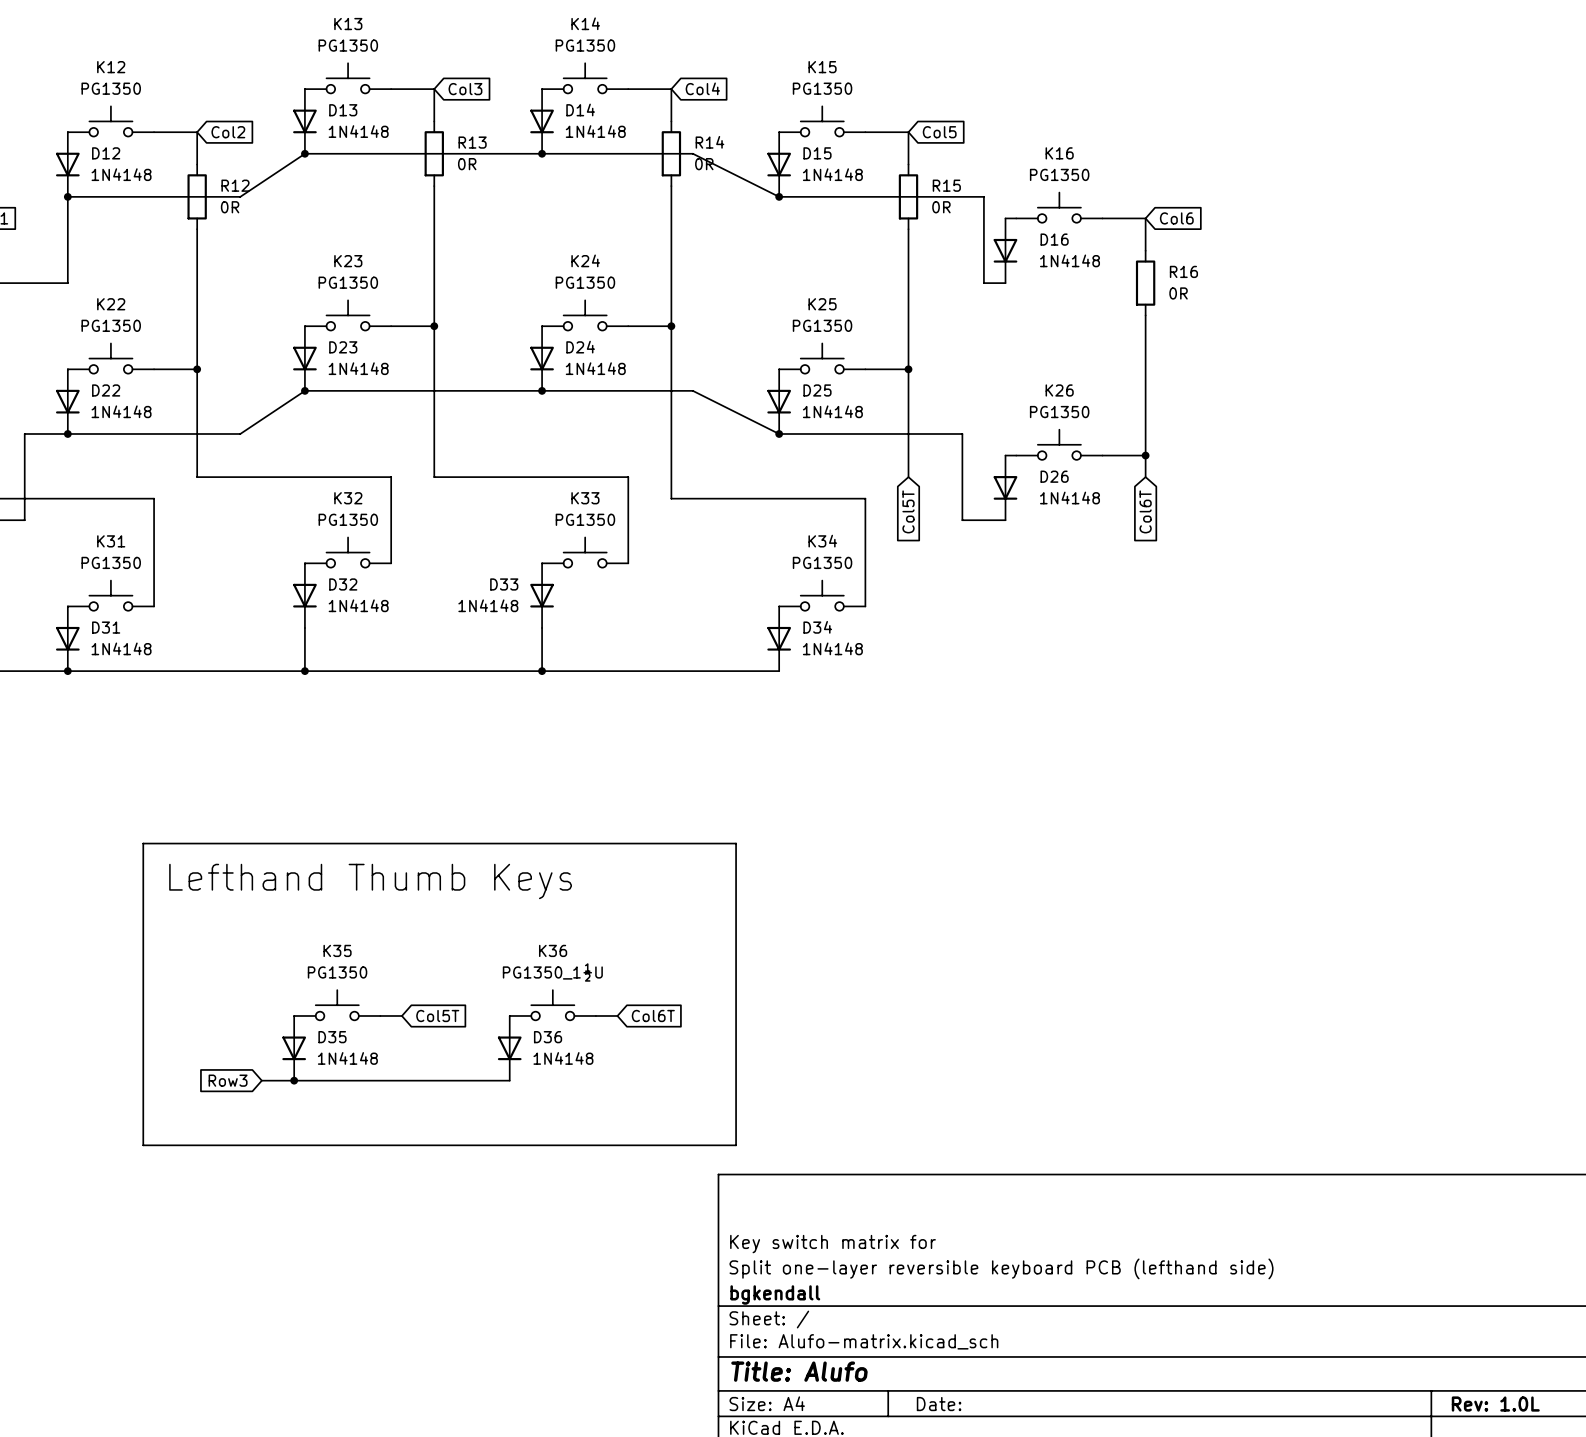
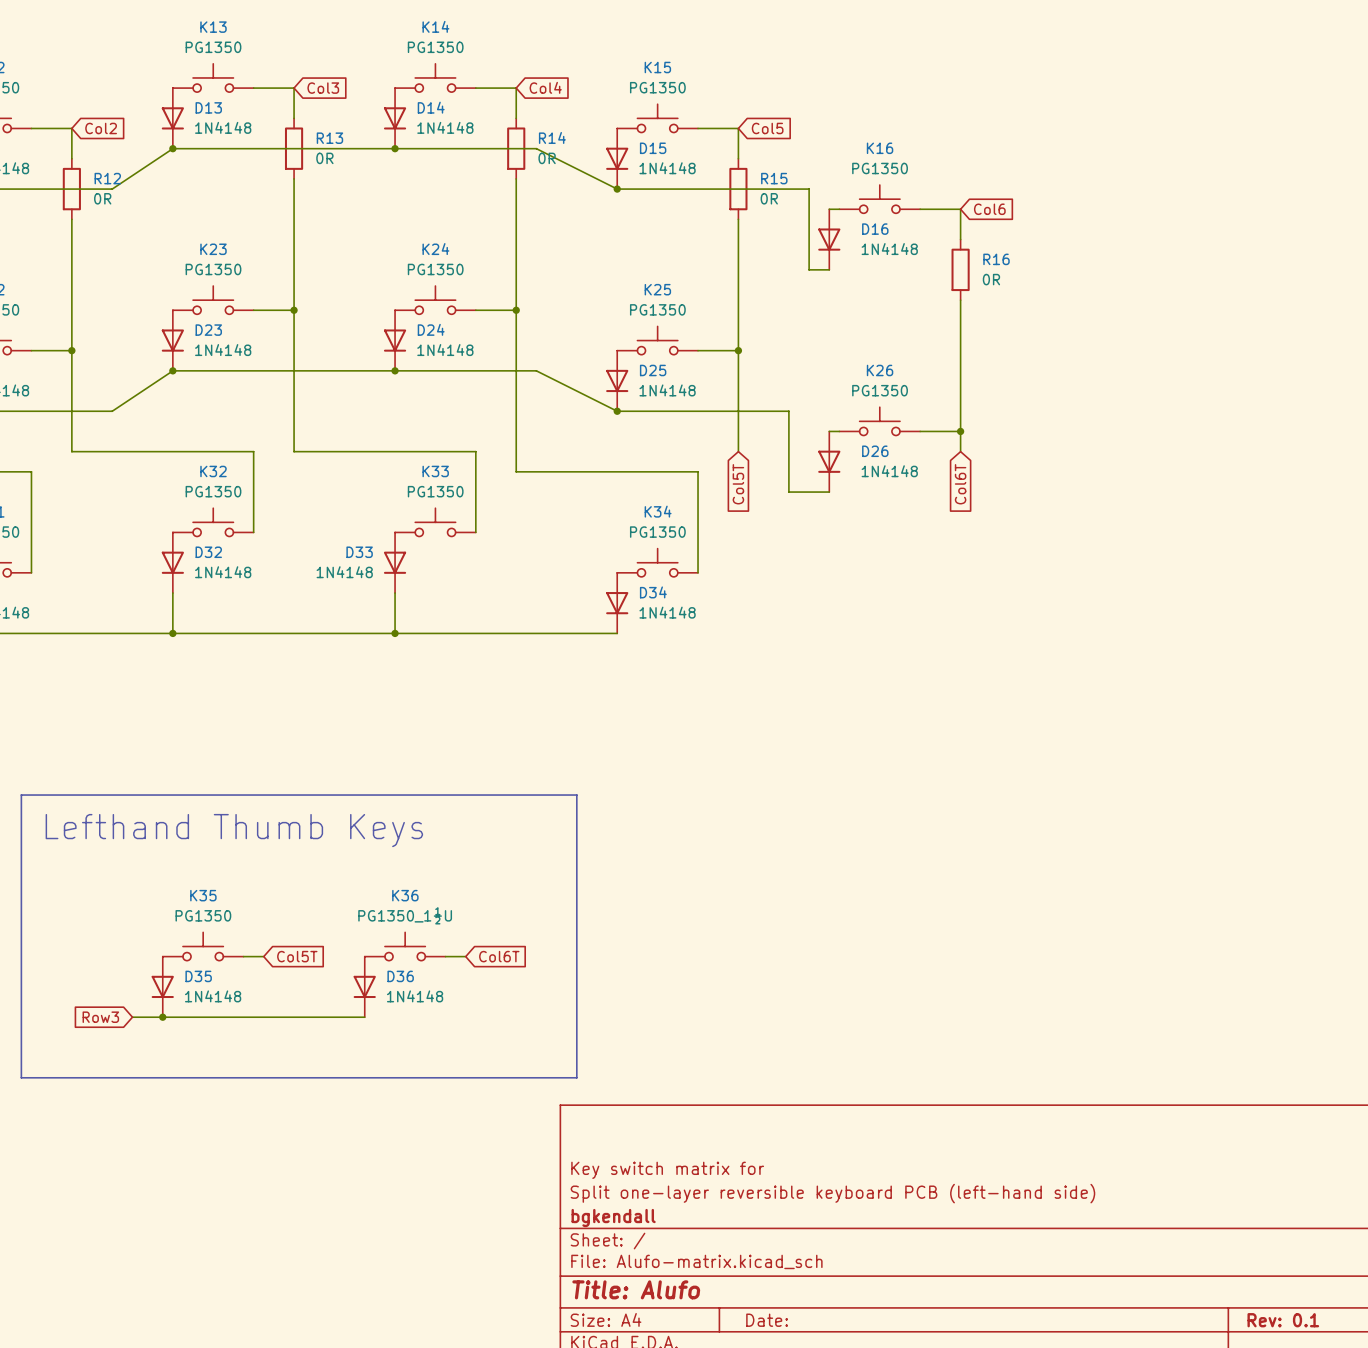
title block: Split one-layer reversible keyboard PCB (lefthand side) (1001, 1268) -> Split one-layer reversible keyboard PCB (left-hand side) (832, 1193)
title block: Rev: 1.0L (1495, 1404) -> Rev: 0.1 (1283, 1320)

